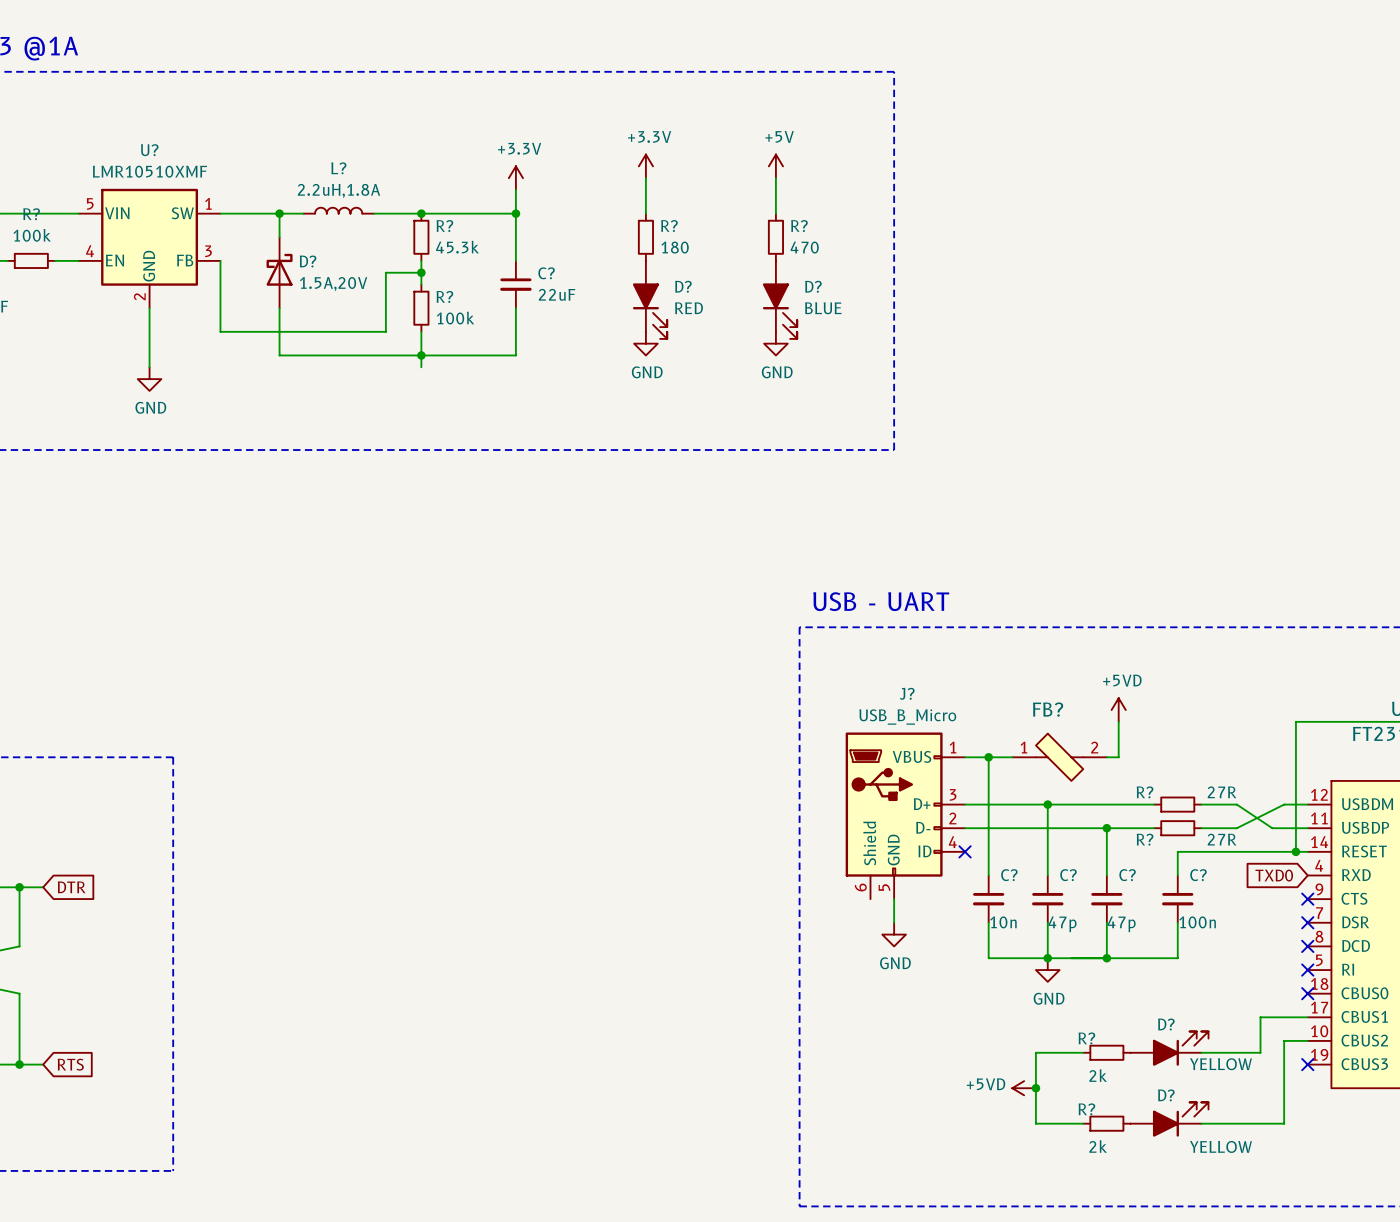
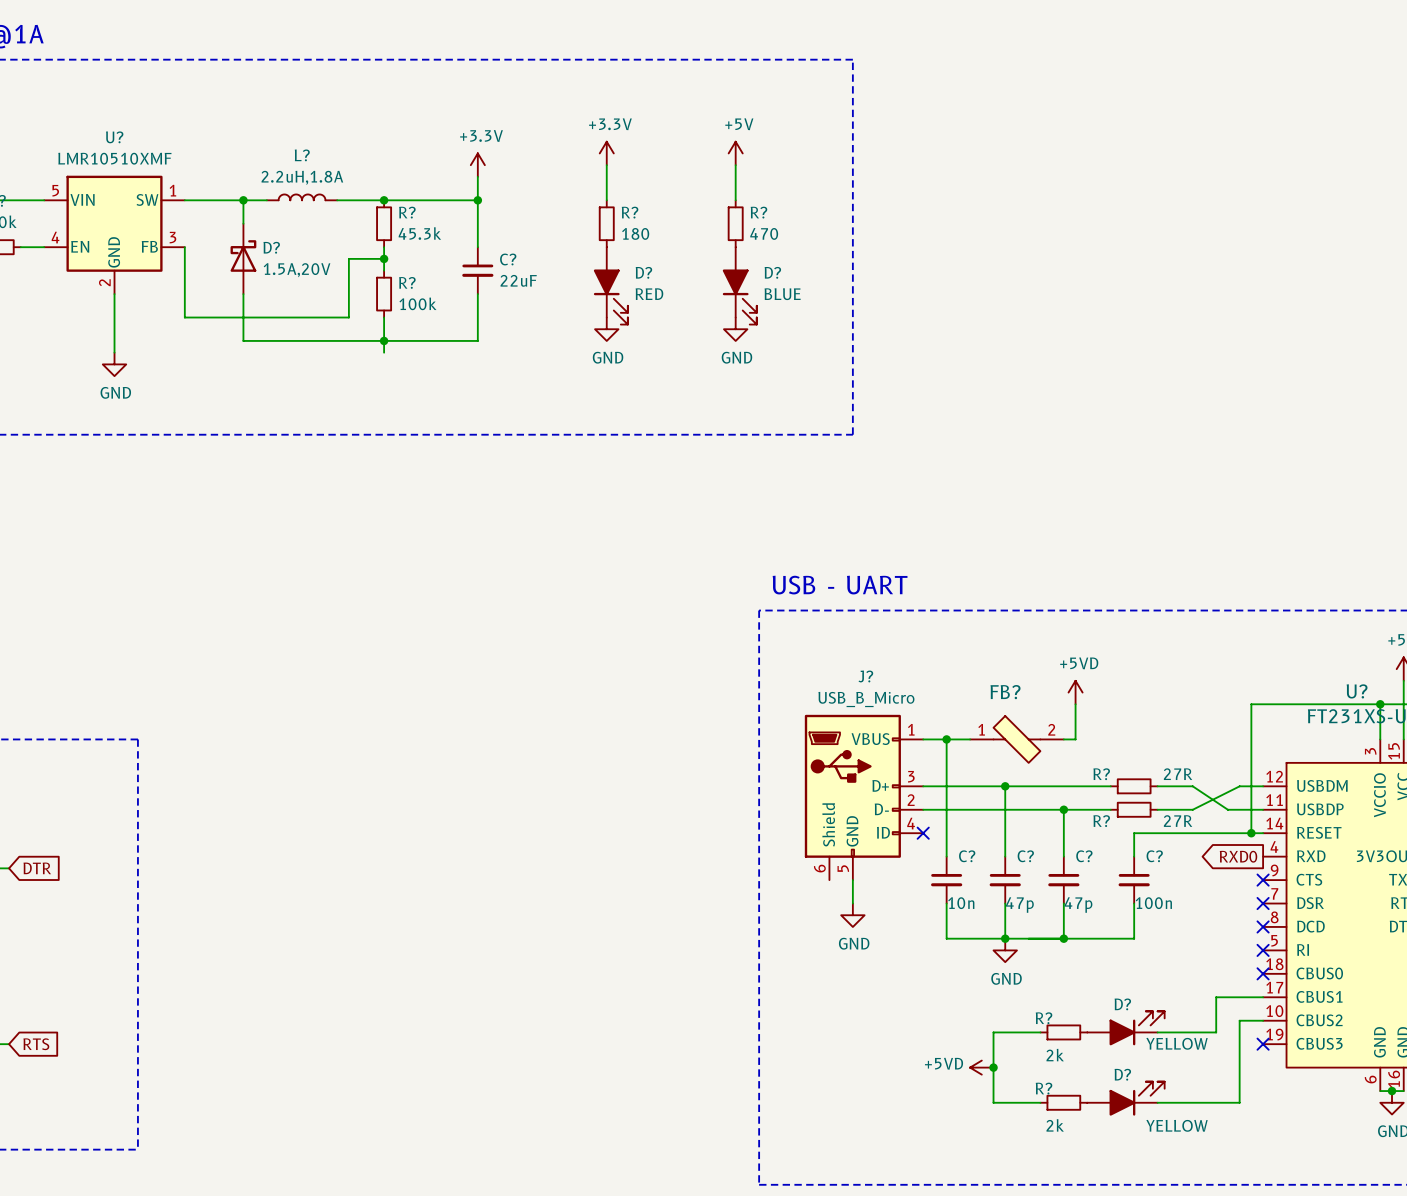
global label shape: input (1274, 875) -> output (1238, 856)
global label: TXD0 (1274, 875) -> RXD0 (1238, 856)

